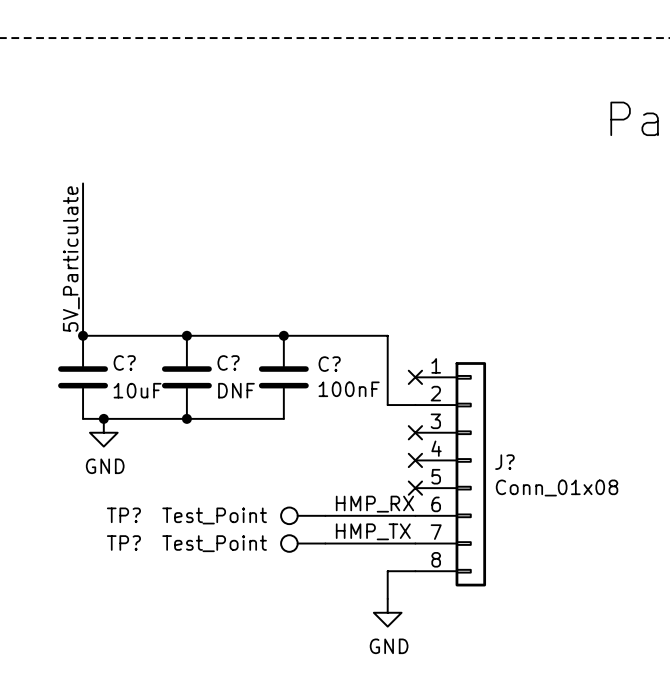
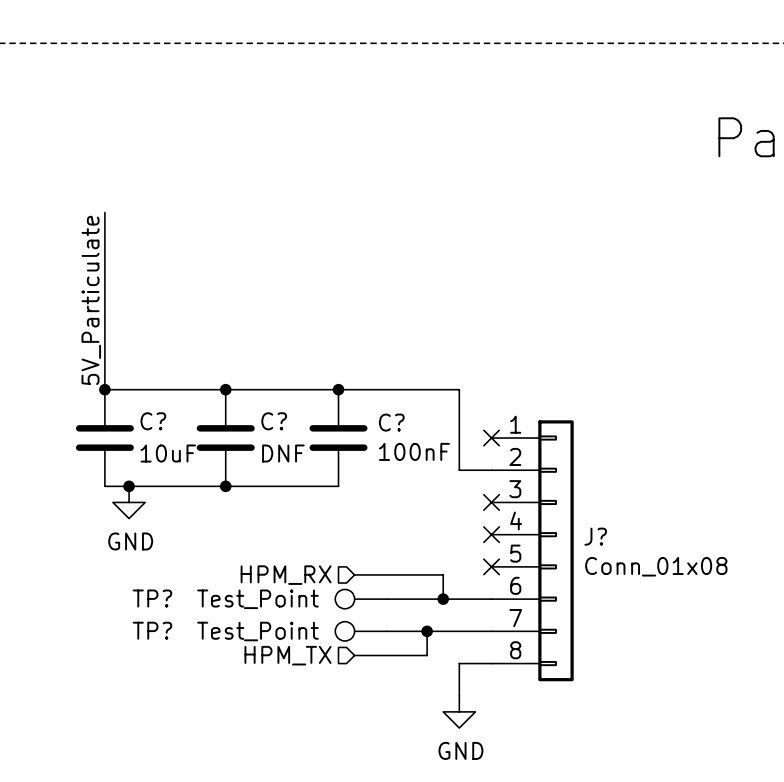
hierarchical label: none -> HPM_RX (286, 575)
wire: none -> (354, 574) (443, 574) (443, 599)
label: HMP_RX (374, 504) -> none
junction: none -> (443, 599)
label: HMP_TX (373, 531) -> none
wire: none -> (427, 631) (427, 655) (354, 655)
junction: none -> (427, 631)
hierarchical label: none -> HPM_TX (288, 655)

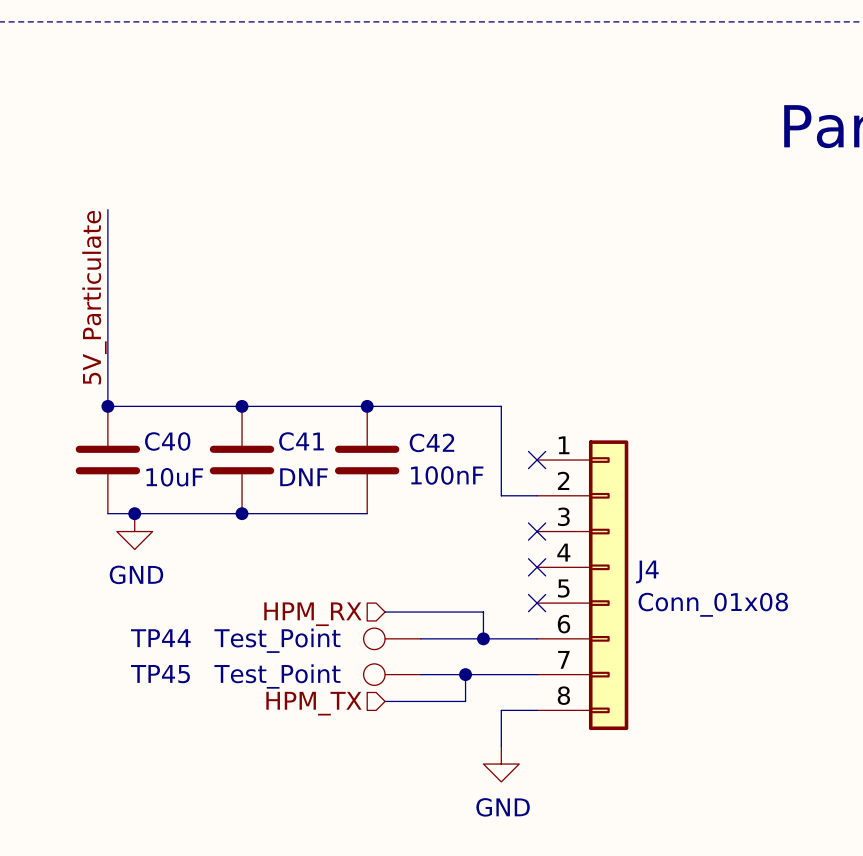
C? name: C? (153, 421) -> C40 (167, 441)
C? name: C? (274, 421) -> C41 (301, 441)
C? name: C? (391, 422) -> C42 (431, 442)
J? name: J? (595, 536) -> J4 (647, 571)
TP? name: TP? (152, 598) -> TP44 (160, 638)
TP? name: TP? (152, 630) -> TP45 (160, 674)

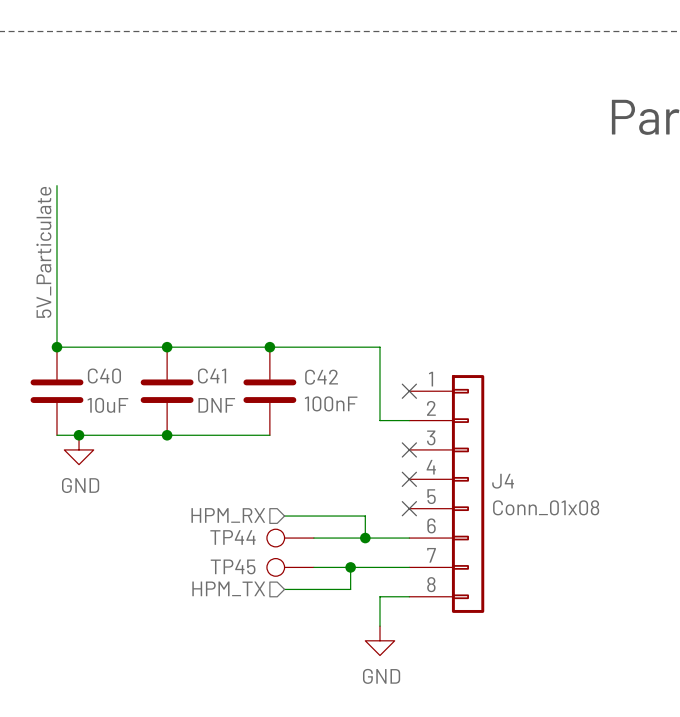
TP44 name position: TP44 (160, 638) -> TP44 (232, 537)
TP44 value: Test_Point (277, 640) -> none
TP45 name position: TP45 (160, 674) -> TP45 (233, 566)
TP45 value: Test_Point (277, 676) -> none

